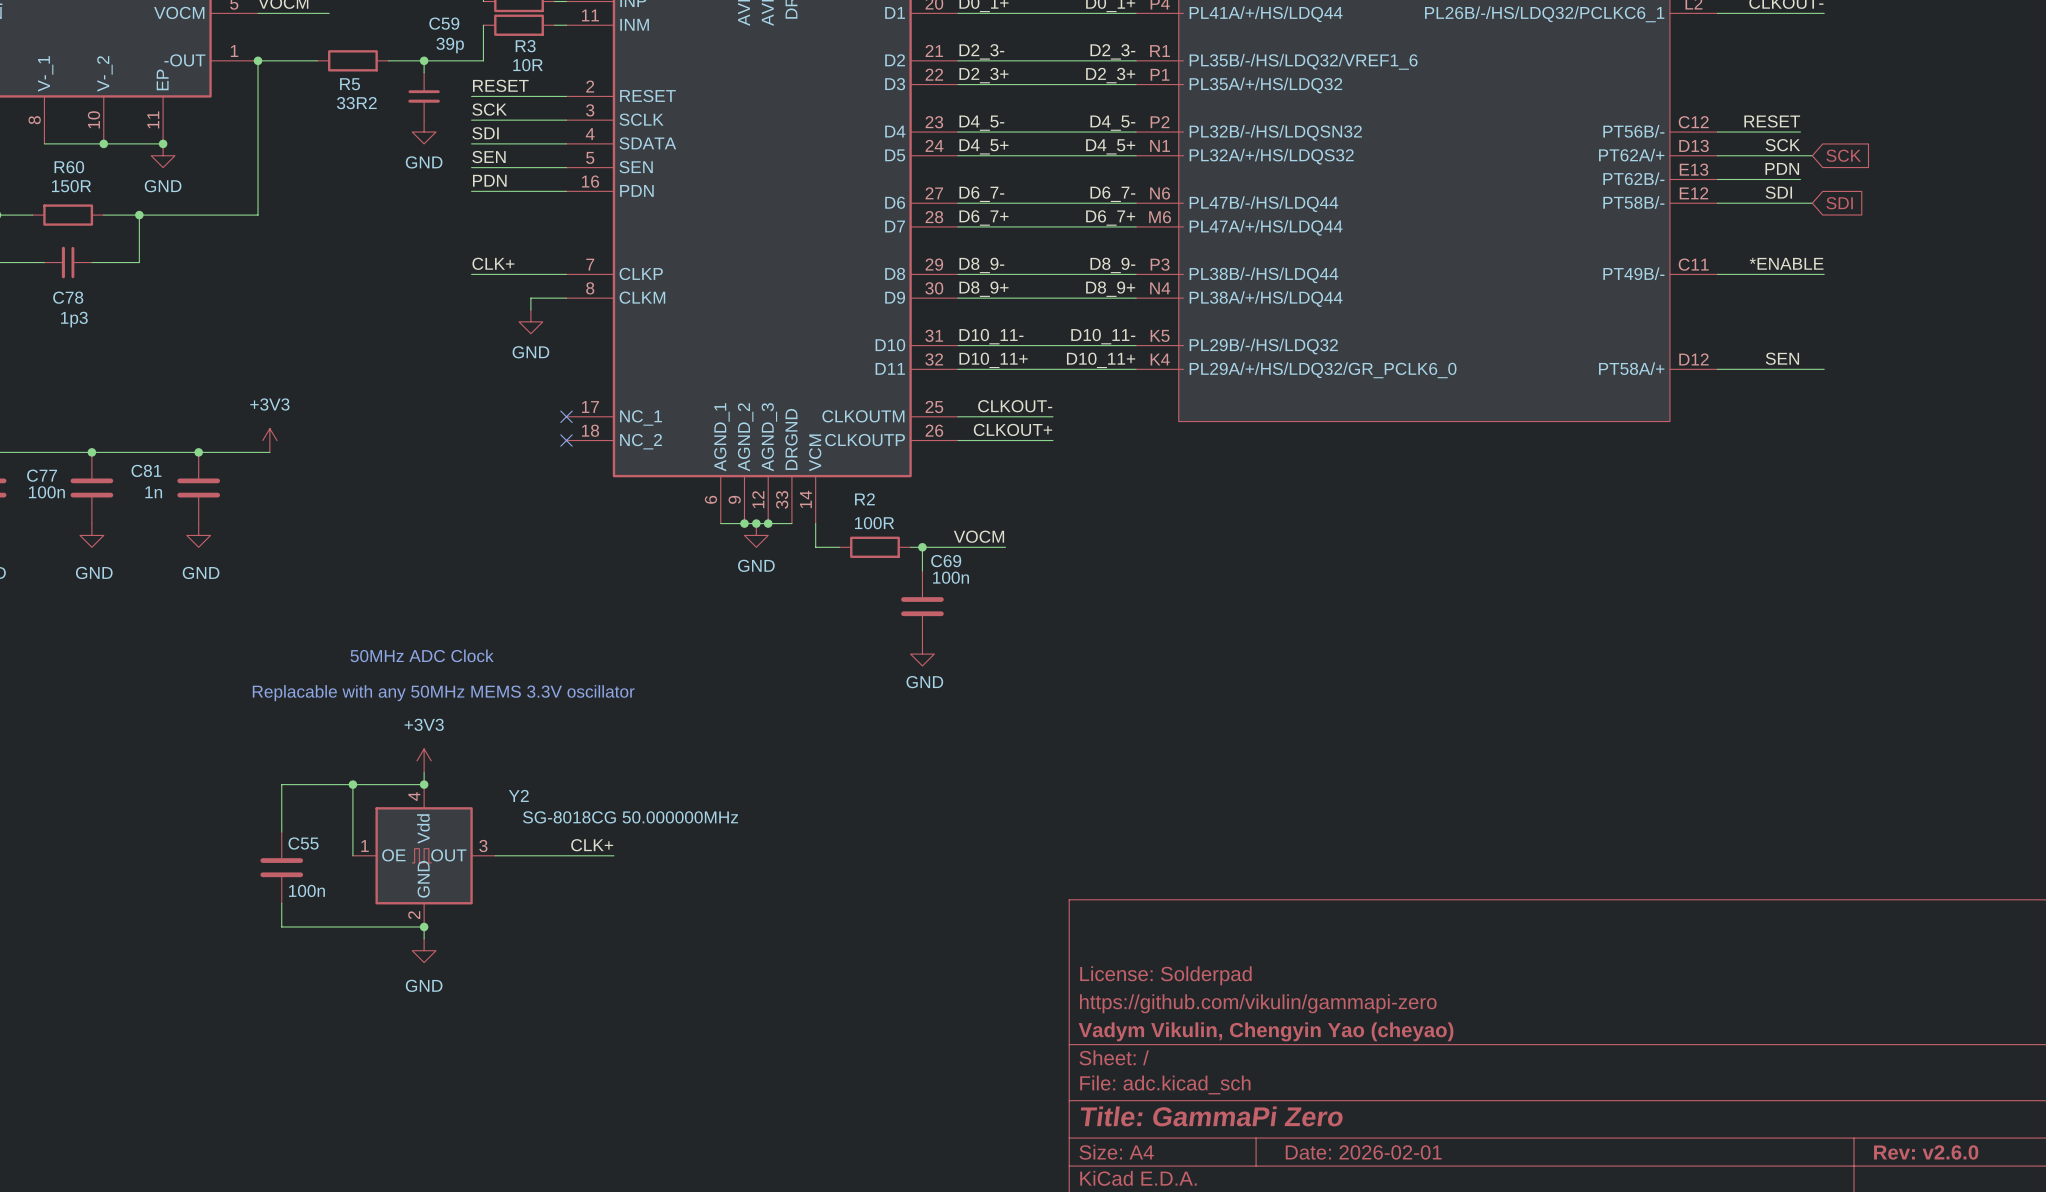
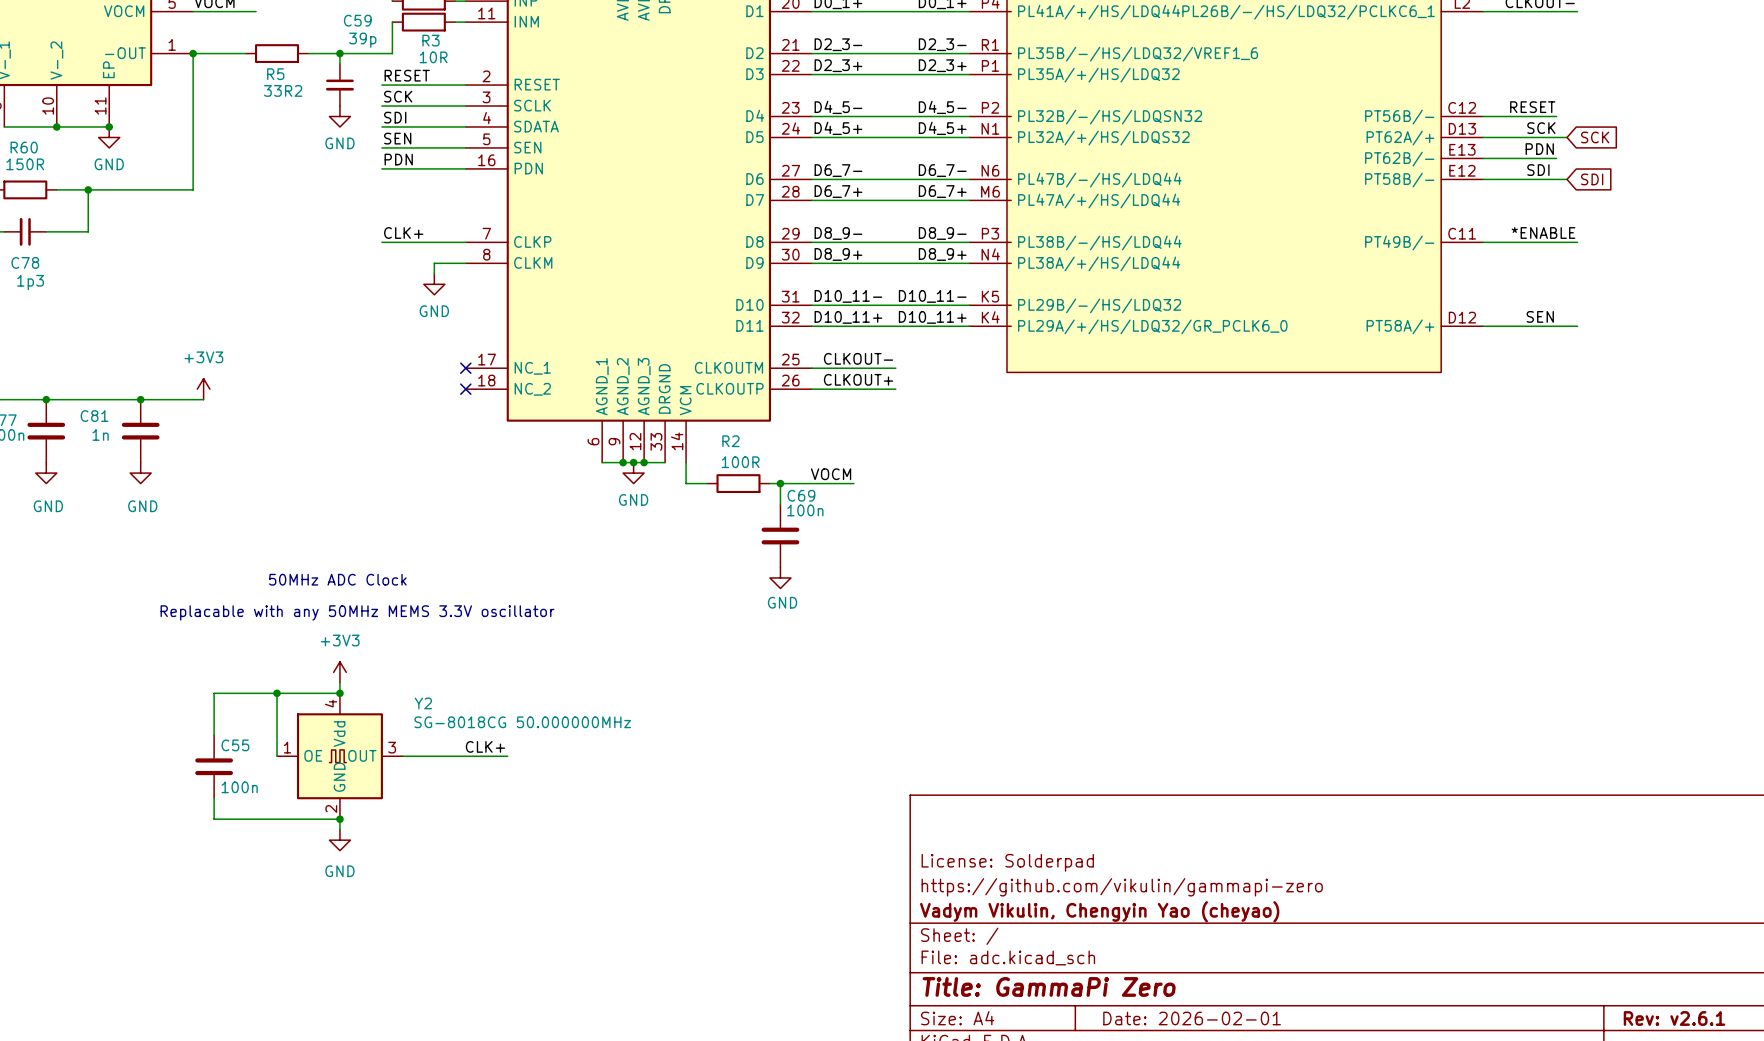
title block: Rev: v2.6.0 (1926, 1152) -> Rev: v2.6.1 (1674, 1018)

